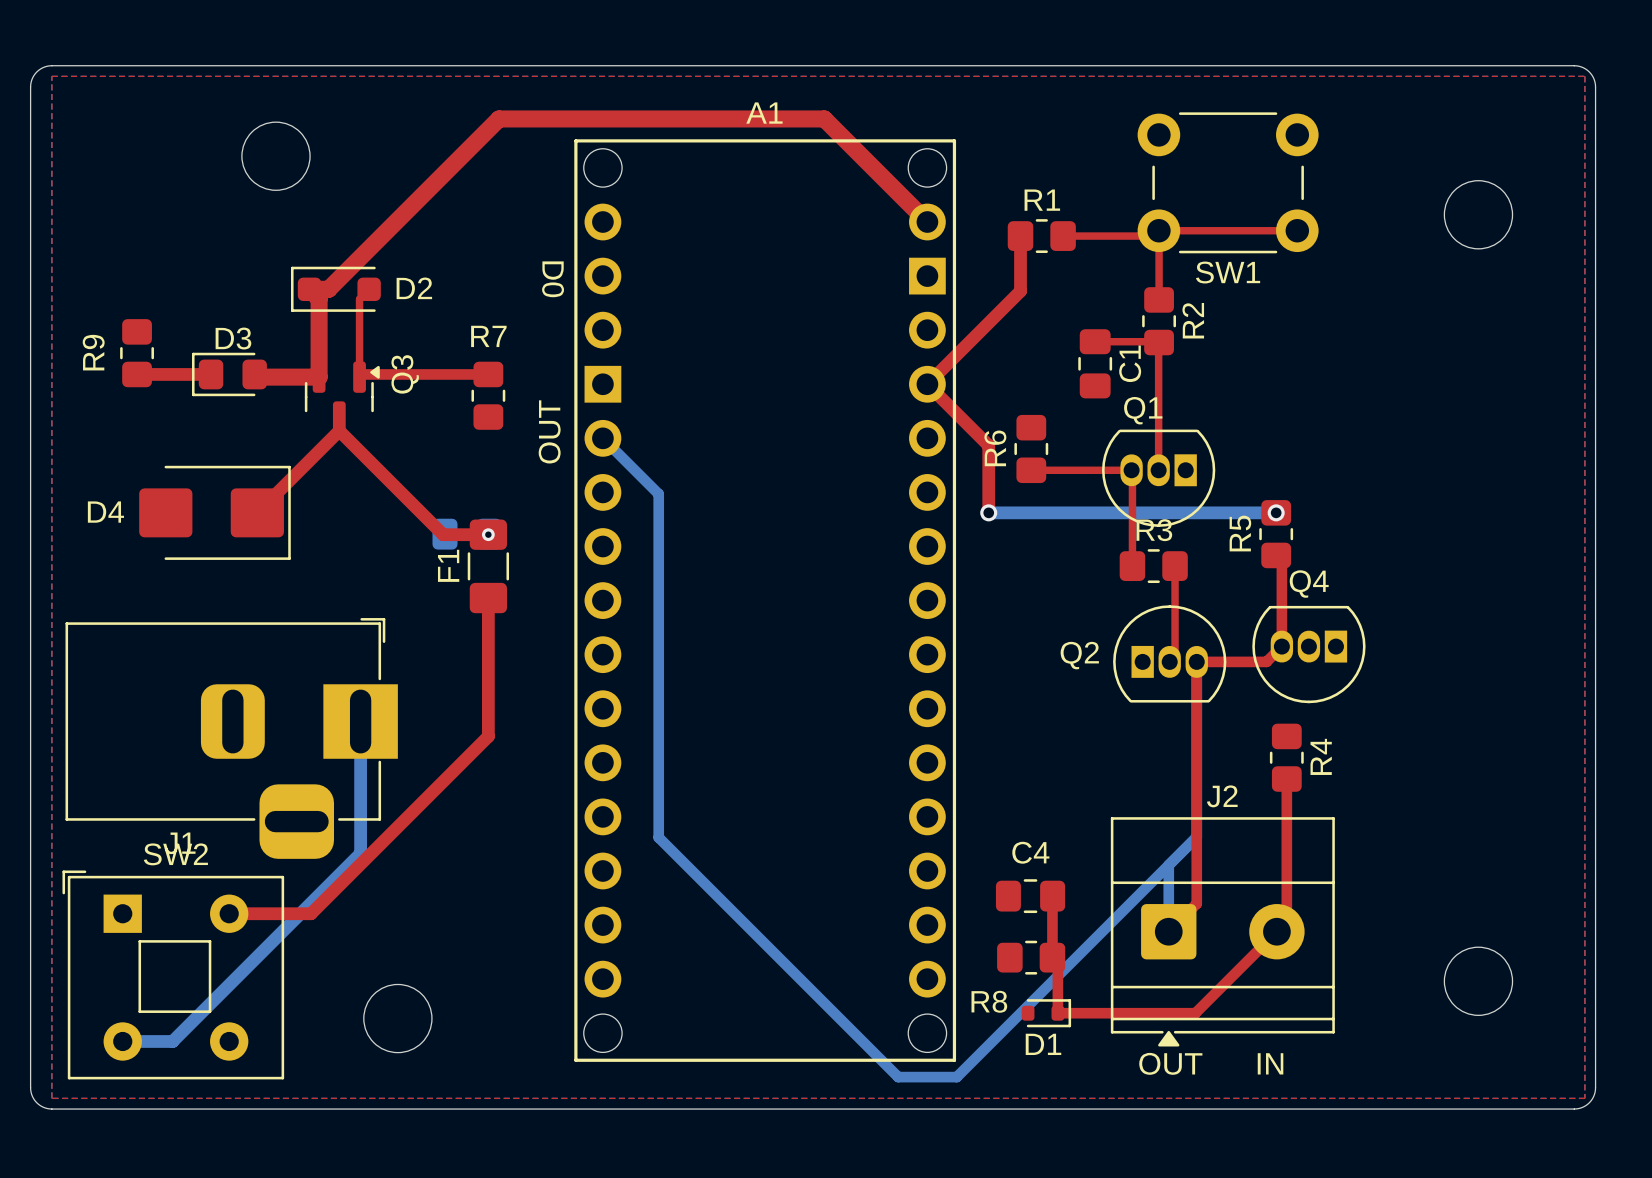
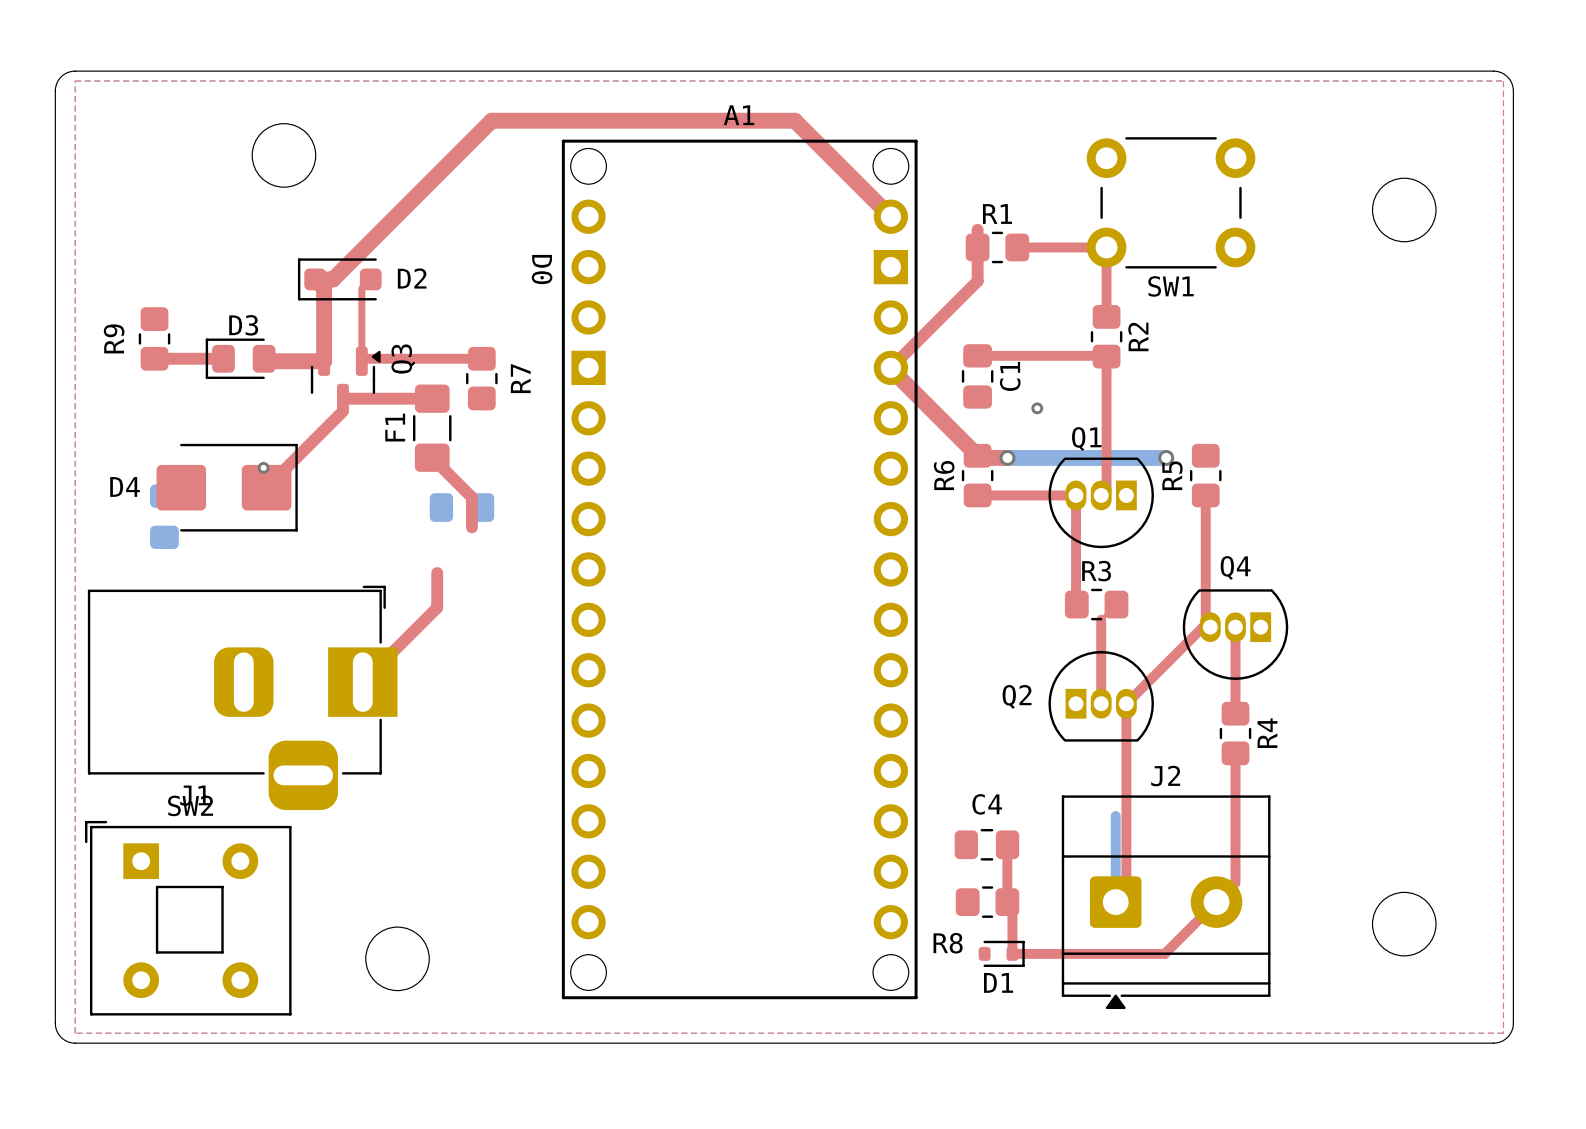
SW1 position: (1228, 182) -> (1171, 202)
top track: (1158, 230) (1297, 230) -> none
top track: (1159, 230) (1159, 299) -> none
R1 position: (1041, 236) -> (997, 247)
top track: (1063, 236) (1153, 236) -> none
top track: none -> (1017, 247) (1106, 247) (1106, 316)
R2 position: (1159, 321) -> (1106, 336)
R7 name rotation: 0° (488, 336) -> 90° counterclockwise (520, 378)
R7 name position: R7 (488, 336) -> R7 (520, 378)
top track: (1095, 341) (1158, 341) -> none
top track: (1158, 342) (1158, 470) -> none
C1 position: (1095, 363) -> (977, 376)
top track: none -> (977, 355) (1106, 356) (1106, 490) (1101, 495)
top track: (927, 384) (988, 445) (988, 512) -> (890, 367) (979, 457) (1007, 457)
top track: none -> (343, 398) (432, 398)
via: none -> (1037, 408)
top track: (339, 430) (443, 534) (488, 534) -> none
text: OUT (549, 431) -> none
bottom track: (602, 438) (658, 494) (658, 837) (898, 1077) (956, 1077) (1196, 837) (1196, 661) -> none
R6 position: (1031, 448) -> (977, 475)
top track: (1031, 470) (1131, 470) -> none
top track: (1132, 471) (1132, 566) -> none
Q1 position: (1158, 478) -> (1101, 502)
top track: none -> (432, 457) (471, 497) (471, 527)
bottom track: none -> (1007, 457) (1166, 457)
via: none -> (263, 467)
bottom track: (988, 512) (1276, 512) -> none
via position: (988, 512) -> (1007, 457)
via position: (1276, 512) -> (1166, 457)
top track: none -> (977, 495) (1076, 495) (1076, 604)
top track: none -> (1205, 495) (1205, 622) (1210, 627) (1202, 627) (1126, 703) (1126, 891) (1115, 902)
via: (488, 534) -> none
R5 position: (1276, 534) -> (1205, 475)
part: none -> (164, 516)
top track: (1281, 561) (1281, 646) (1266, 661) (1196, 661) (1196, 903) (1168, 931) -> none
F1 position: (488, 566) -> (432, 428)
R3 position: (1153, 566) -> (1096, 604)
top track: (1175, 566) (1175, 656) -> none
top track: (488, 598) (488, 736) (311, 913) (229, 913) -> none
top track: none -> (437, 573) (437, 607) (362, 682)
top track: none -> (1116, 604) (1101, 619) (1101, 703)
Q2 position: (1169, 653) -> (1101, 696)
Q4 position: (1308, 654) -> (1235, 634)
top track: none -> (1235, 627) (1235, 713)
bottom track: (360, 721) (360, 853) (172, 1041) (122, 1041) -> none
R4 position: (1286, 757) -> (1235, 733)
top track: (1286, 779) (1286, 918) -> none
J2 position: (1222, 931) -> (1166, 902)
top track: (1276, 931) (1195, 1013) -> (1235, 753) (1235, 883) (1164, 953) (1140, 953)
text: OUT (1170, 1063) -> none
text: IN (1270, 1063) -> none

